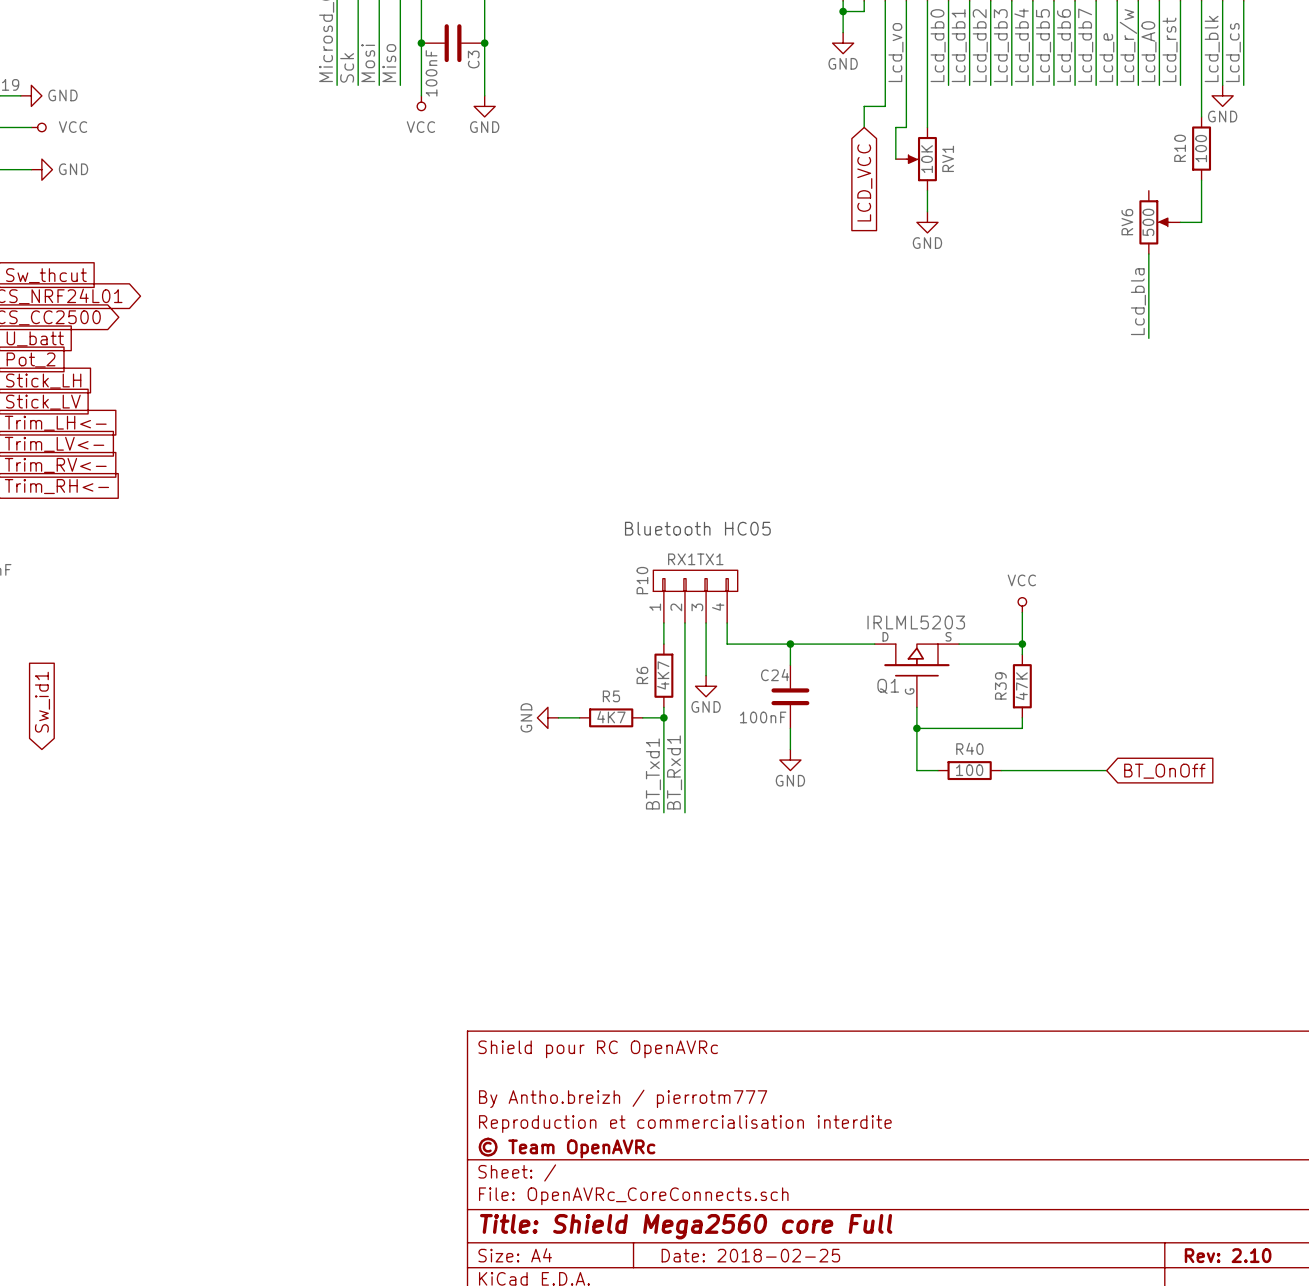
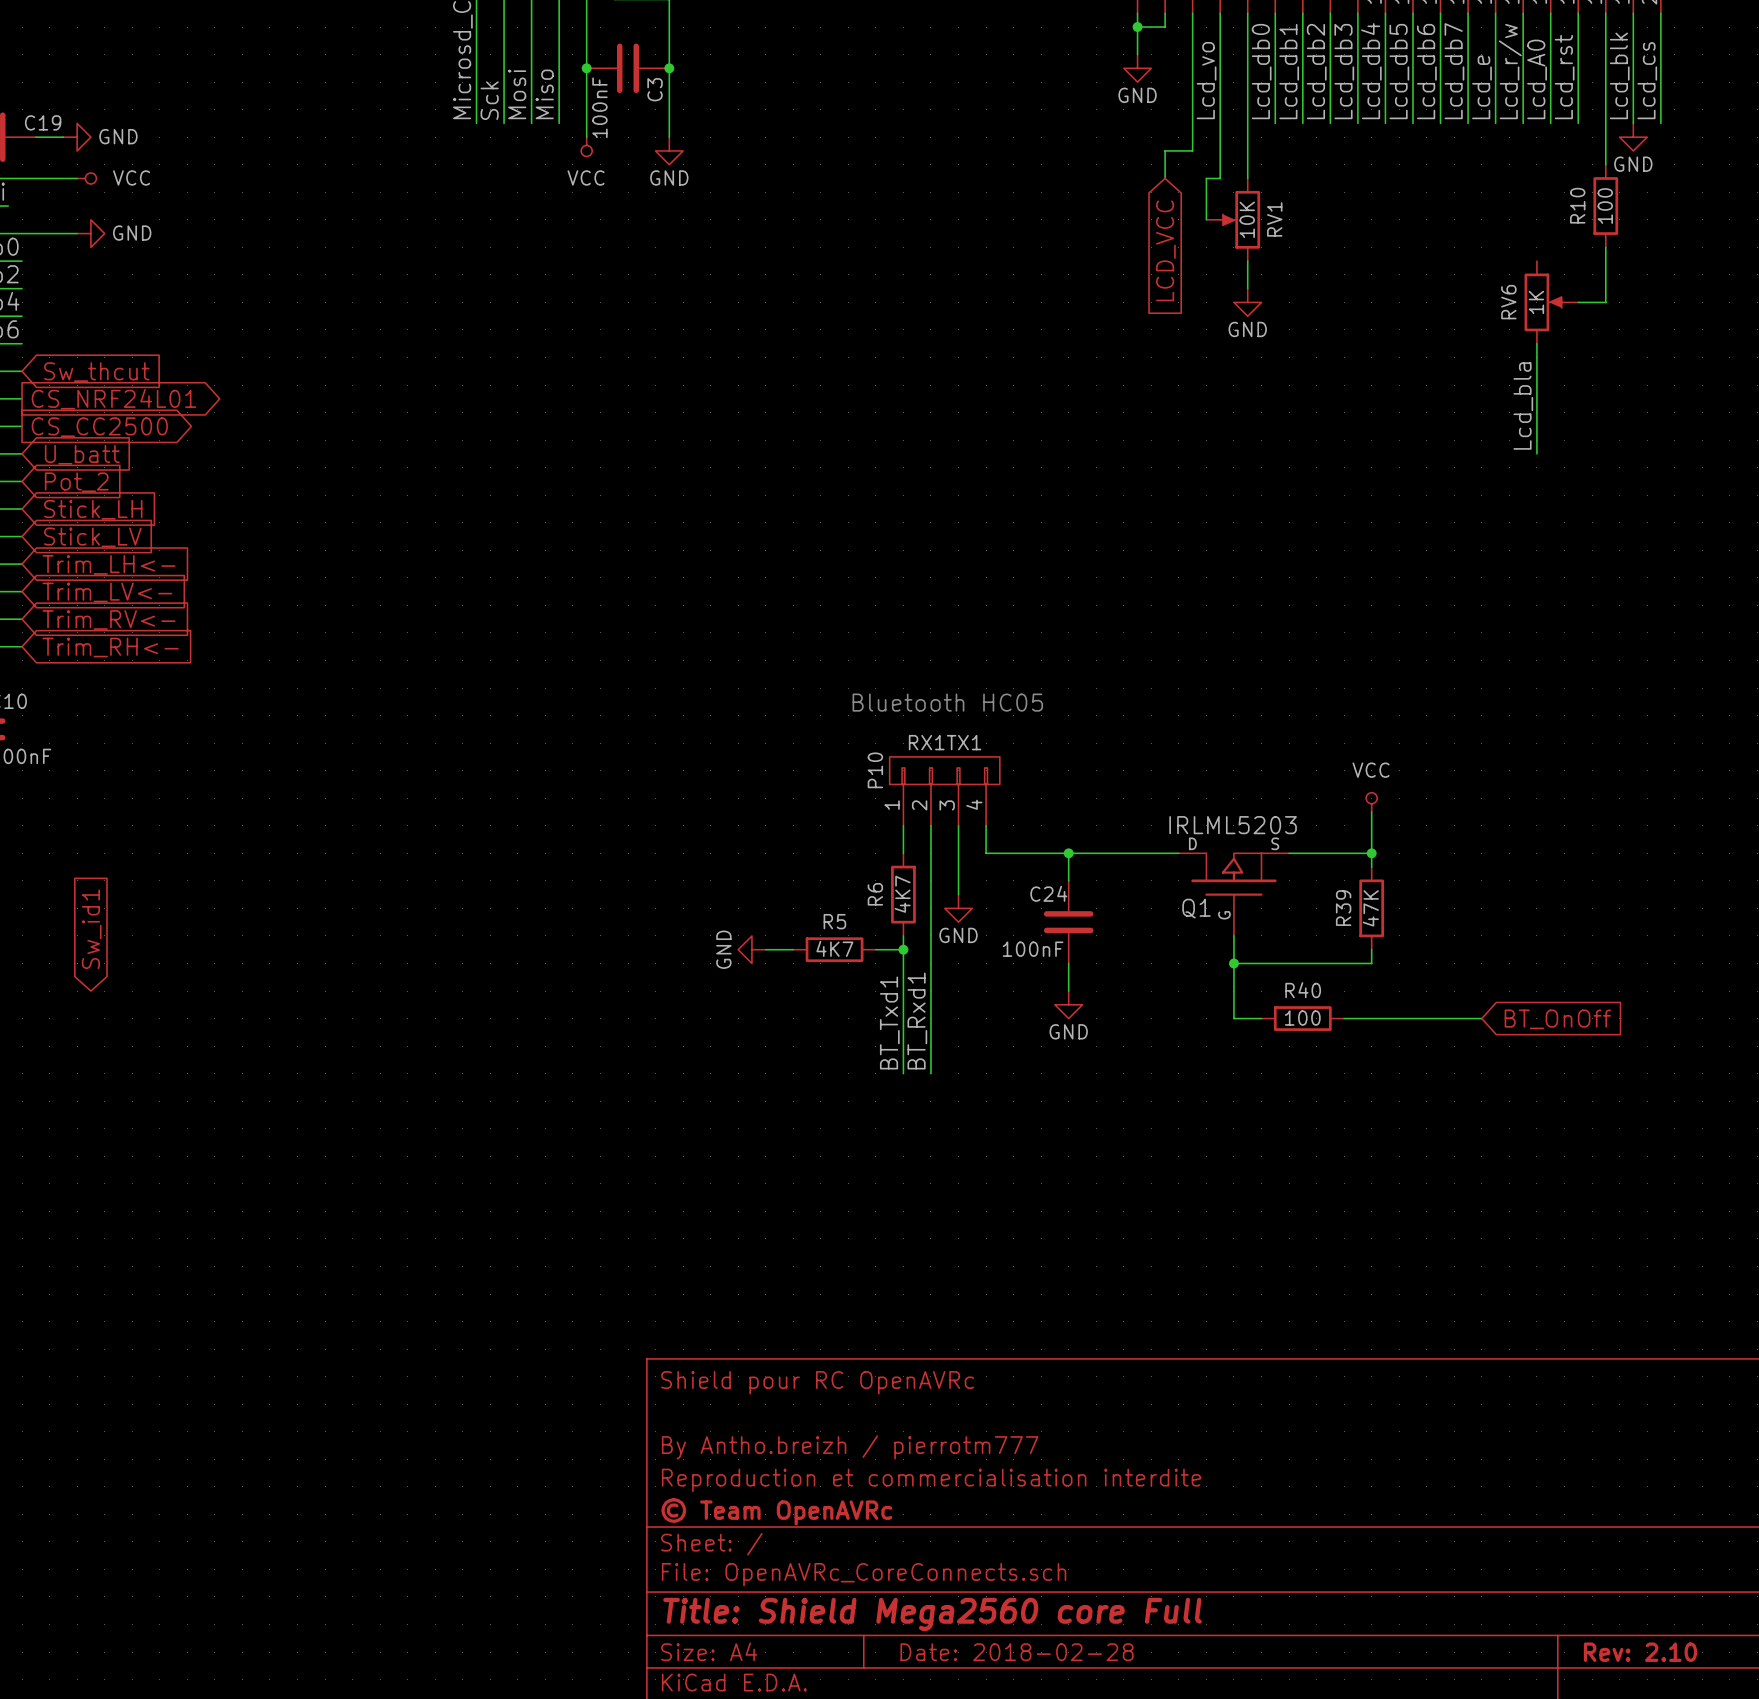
RV6 value: 500 (1148, 222) -> 1K (1536, 302)
title block: Date: 2018-02-25 (750, 1255) -> Date: 2018-02-28 (1017, 1652)

